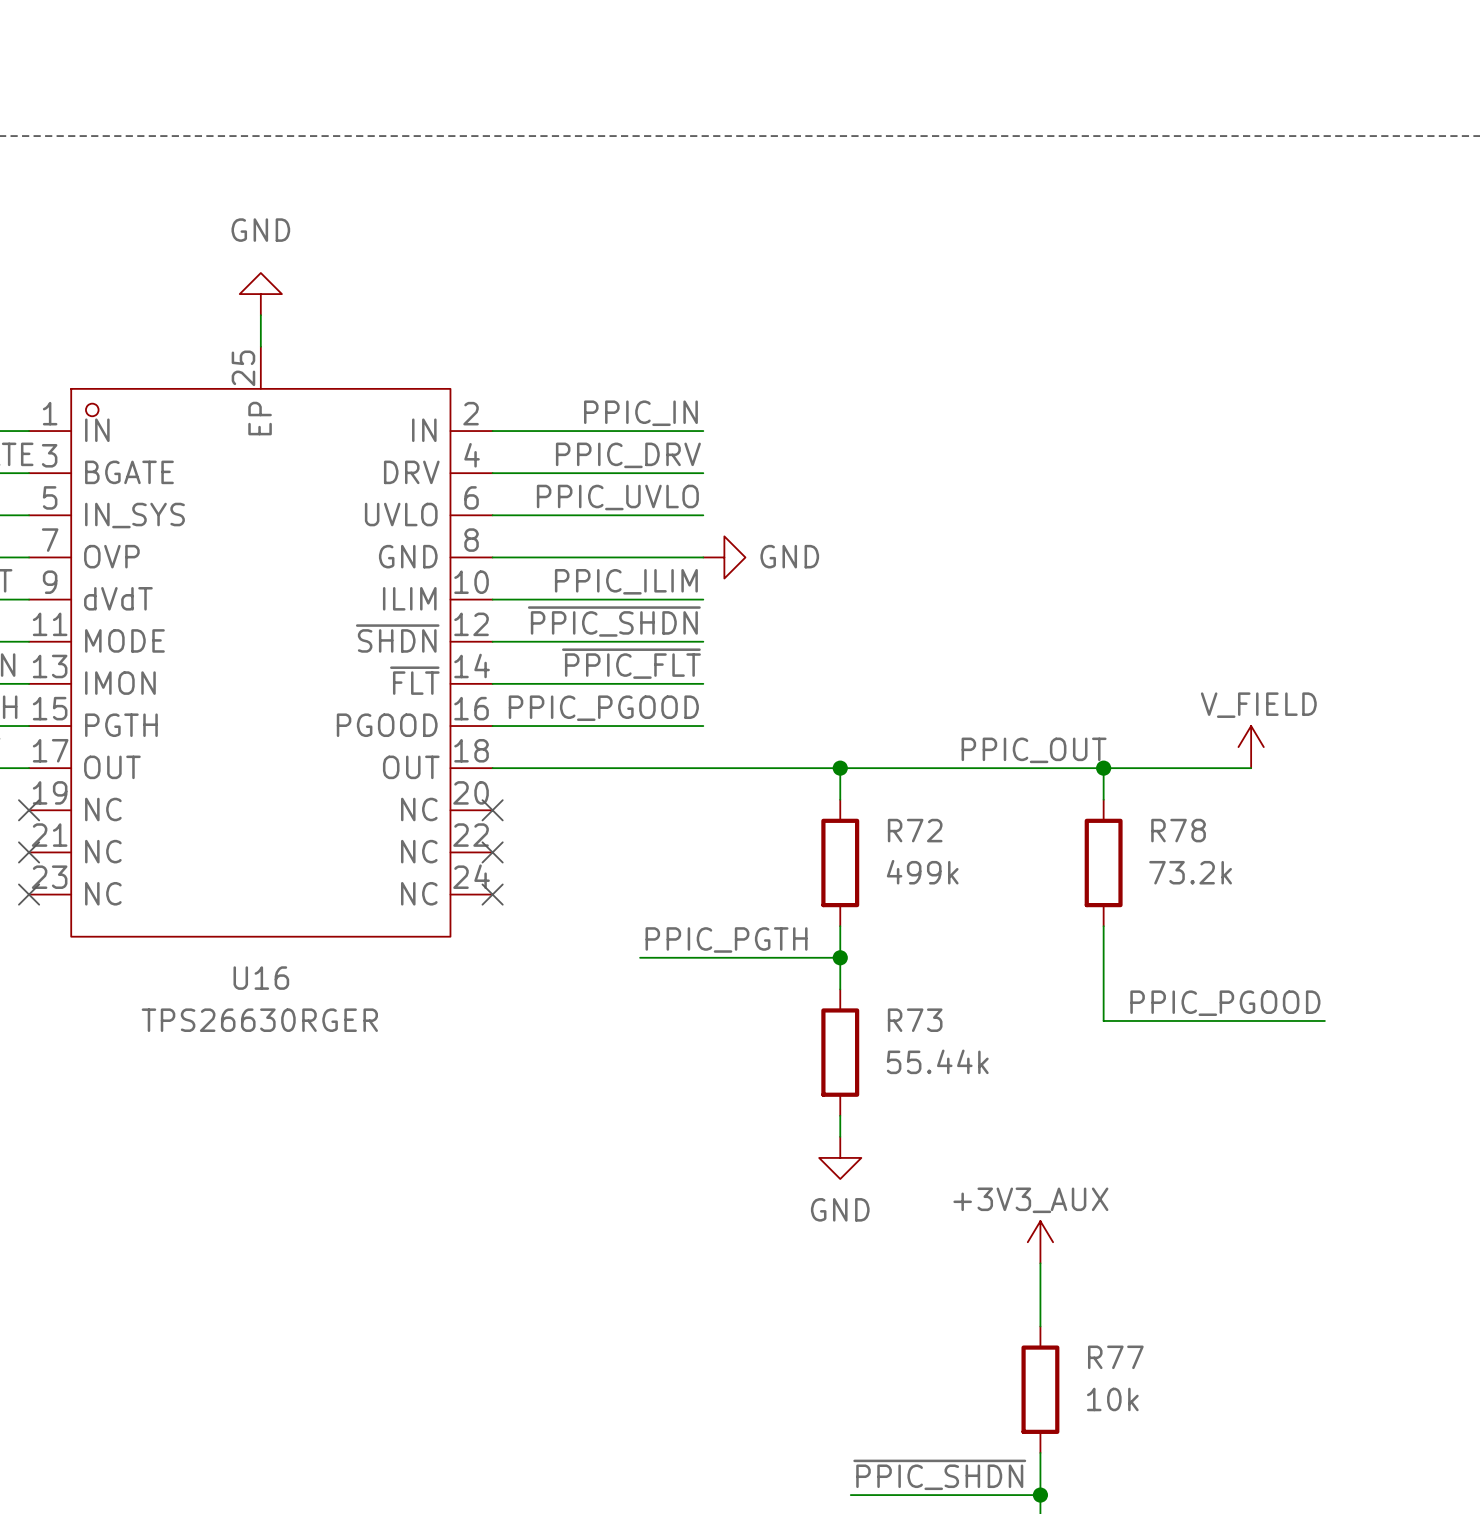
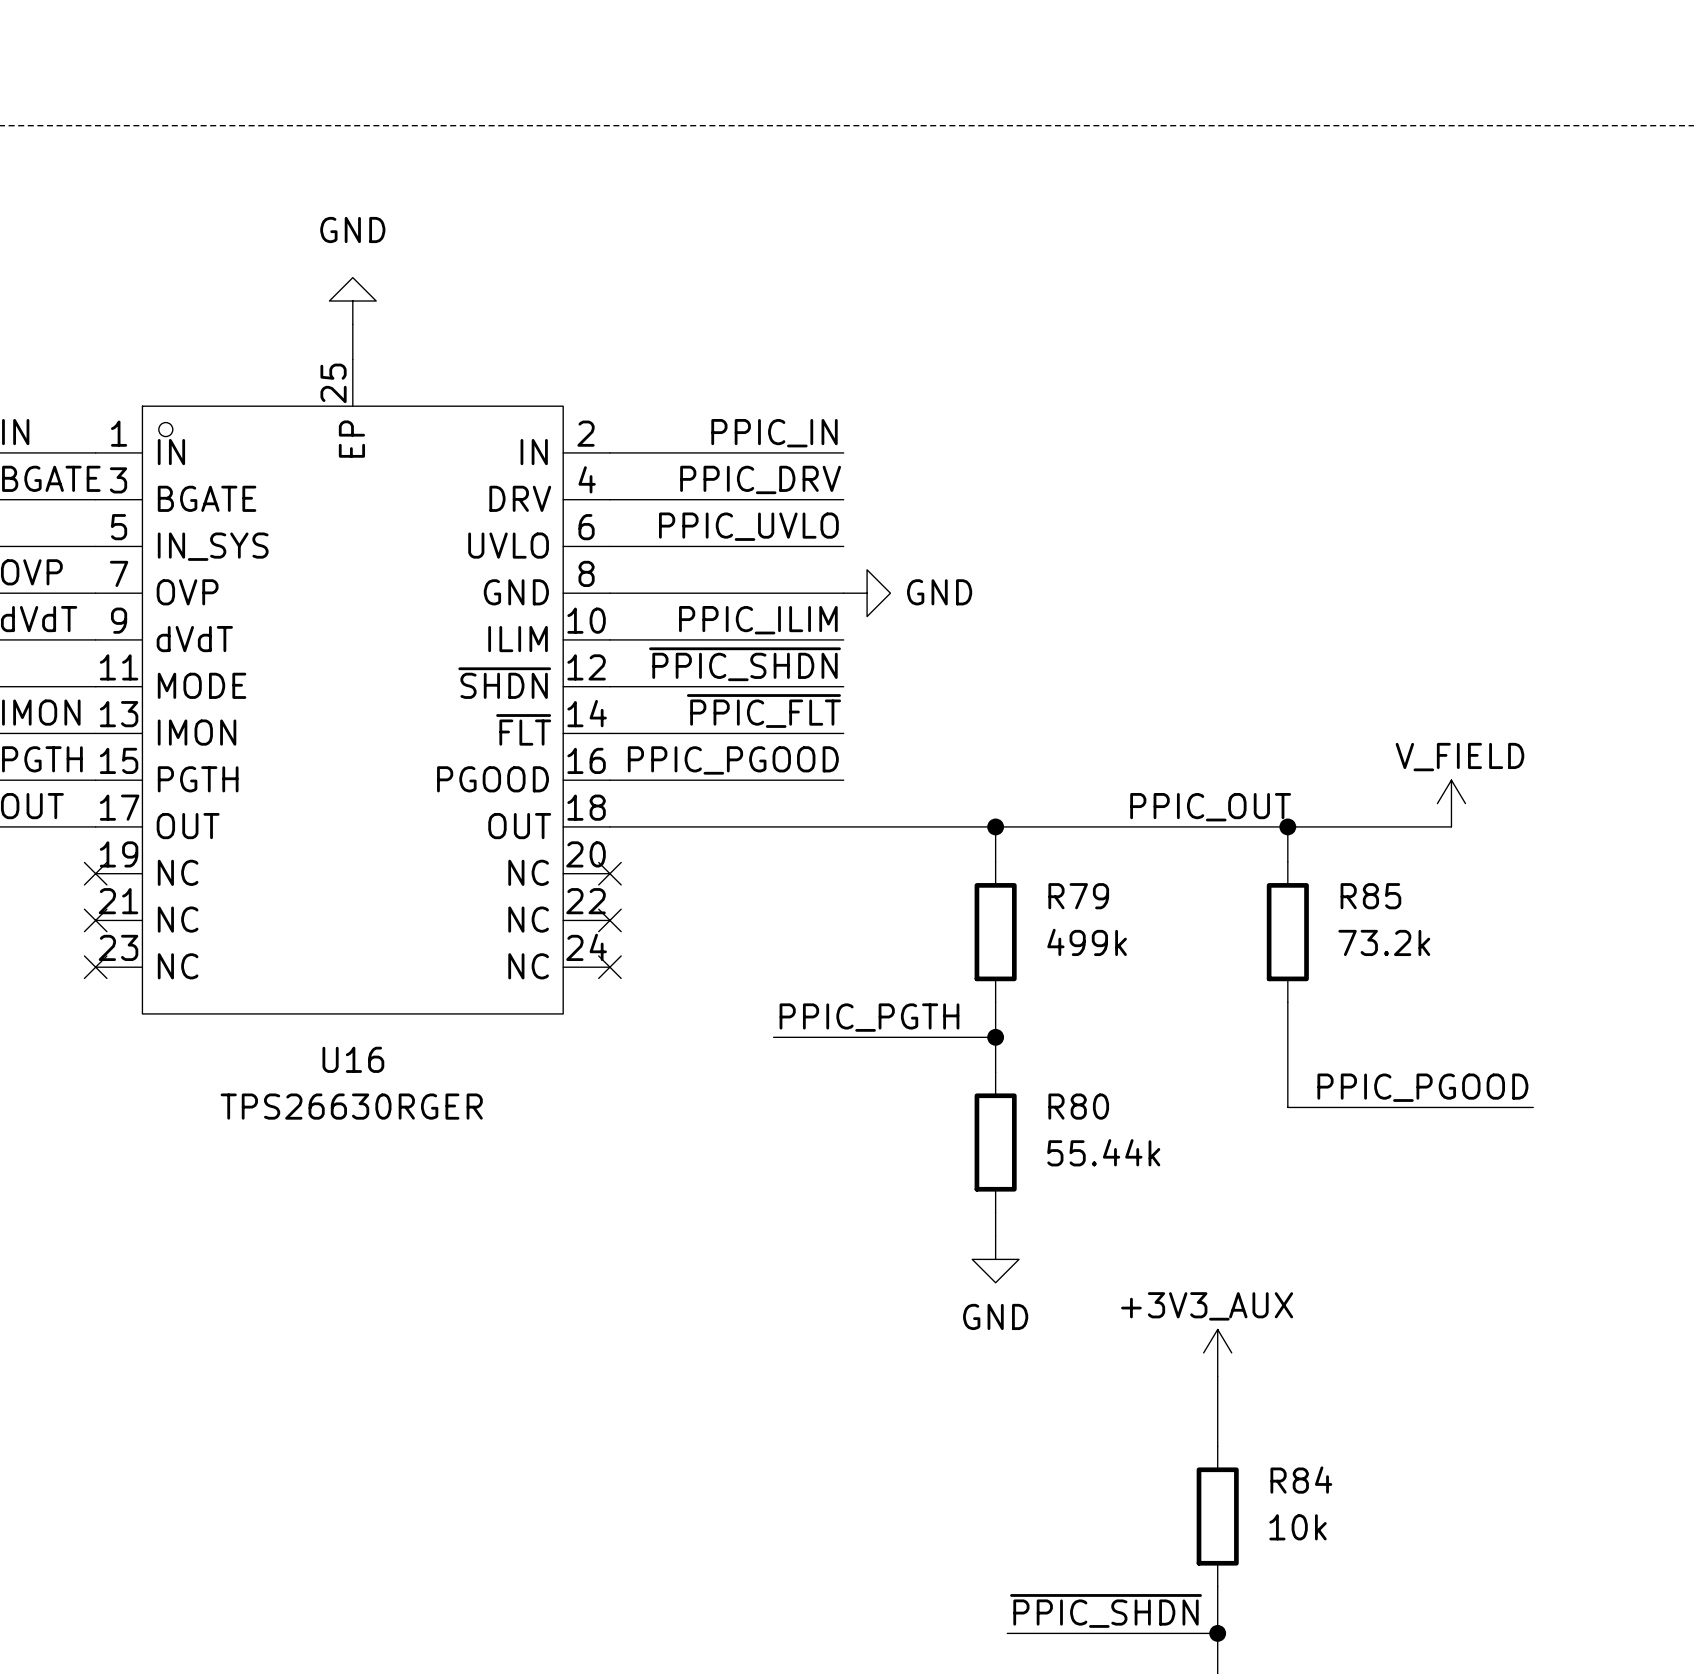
R72 name: R72 (915, 830) -> R79 (1078, 896)
R78 name: R78 (1178, 830) -> R85 (1370, 896)
R73 name: R73 (915, 1020) -> R80 (1078, 1106)
R77 name: R77 (1115, 1357) -> R84 (1301, 1480)

